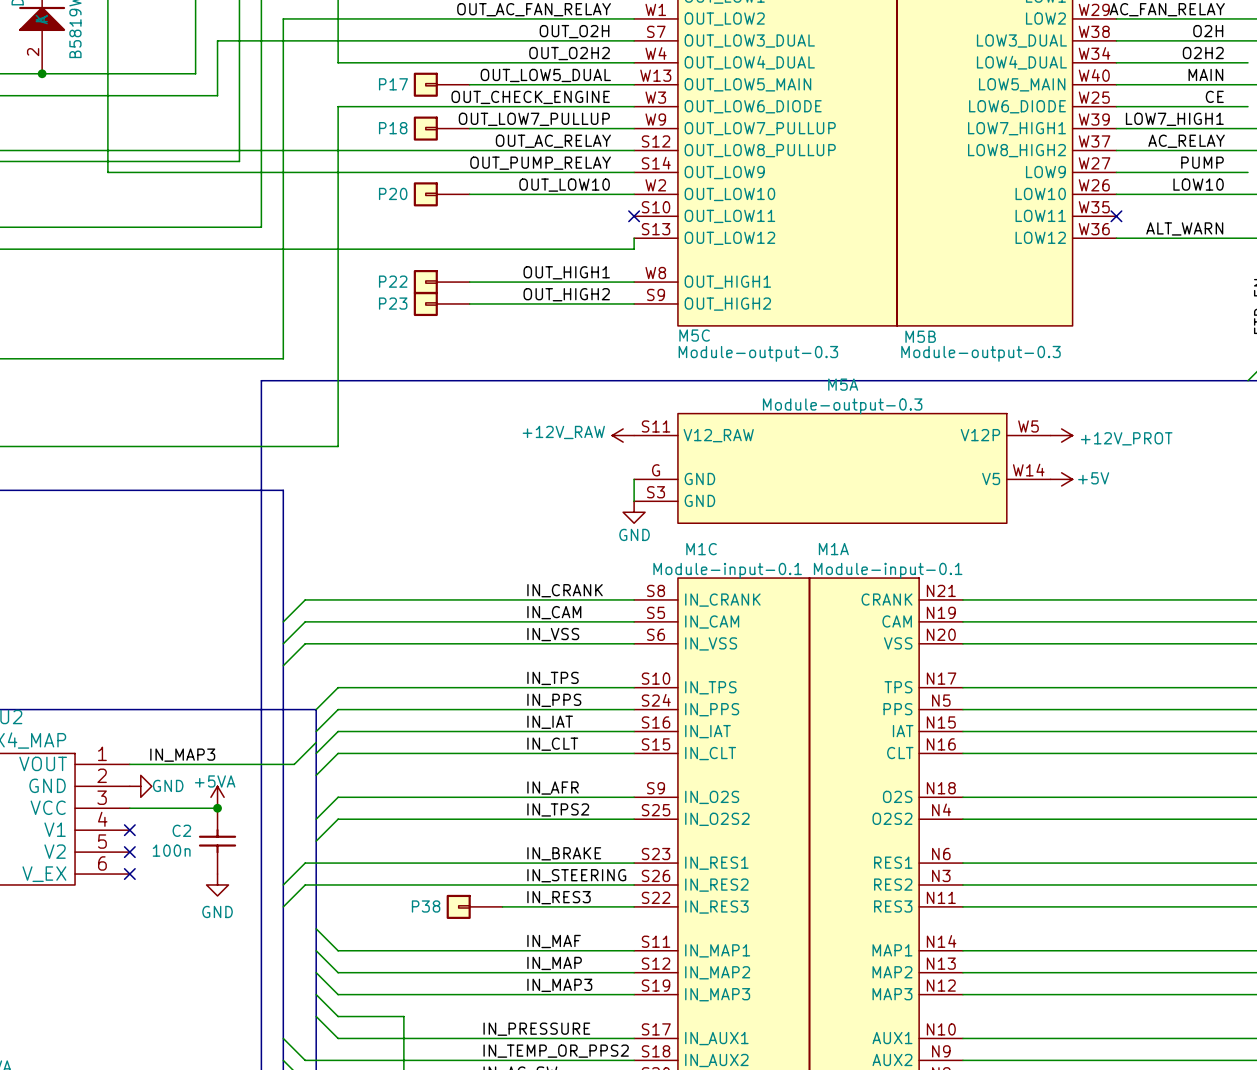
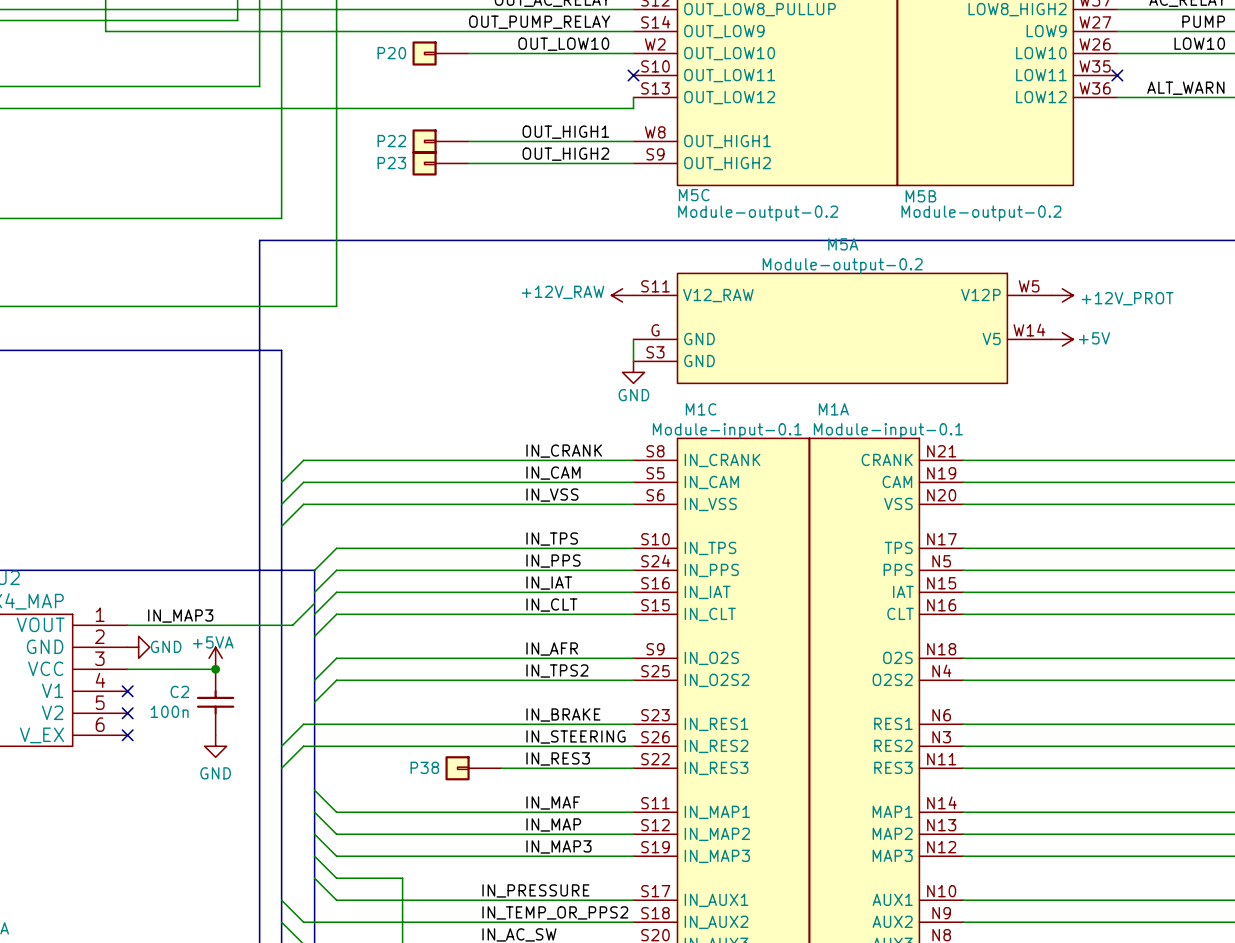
M5C value: Module-output-0.3 (758, 353) -> Module-output-0.2 (758, 213)
M5B value: Module-output-0.3 (980, 353) -> Module-output-0.2 (981, 213)
M5A value: Module-output-0.3 (842, 406) -> Module-output-0.2 (842, 266)

